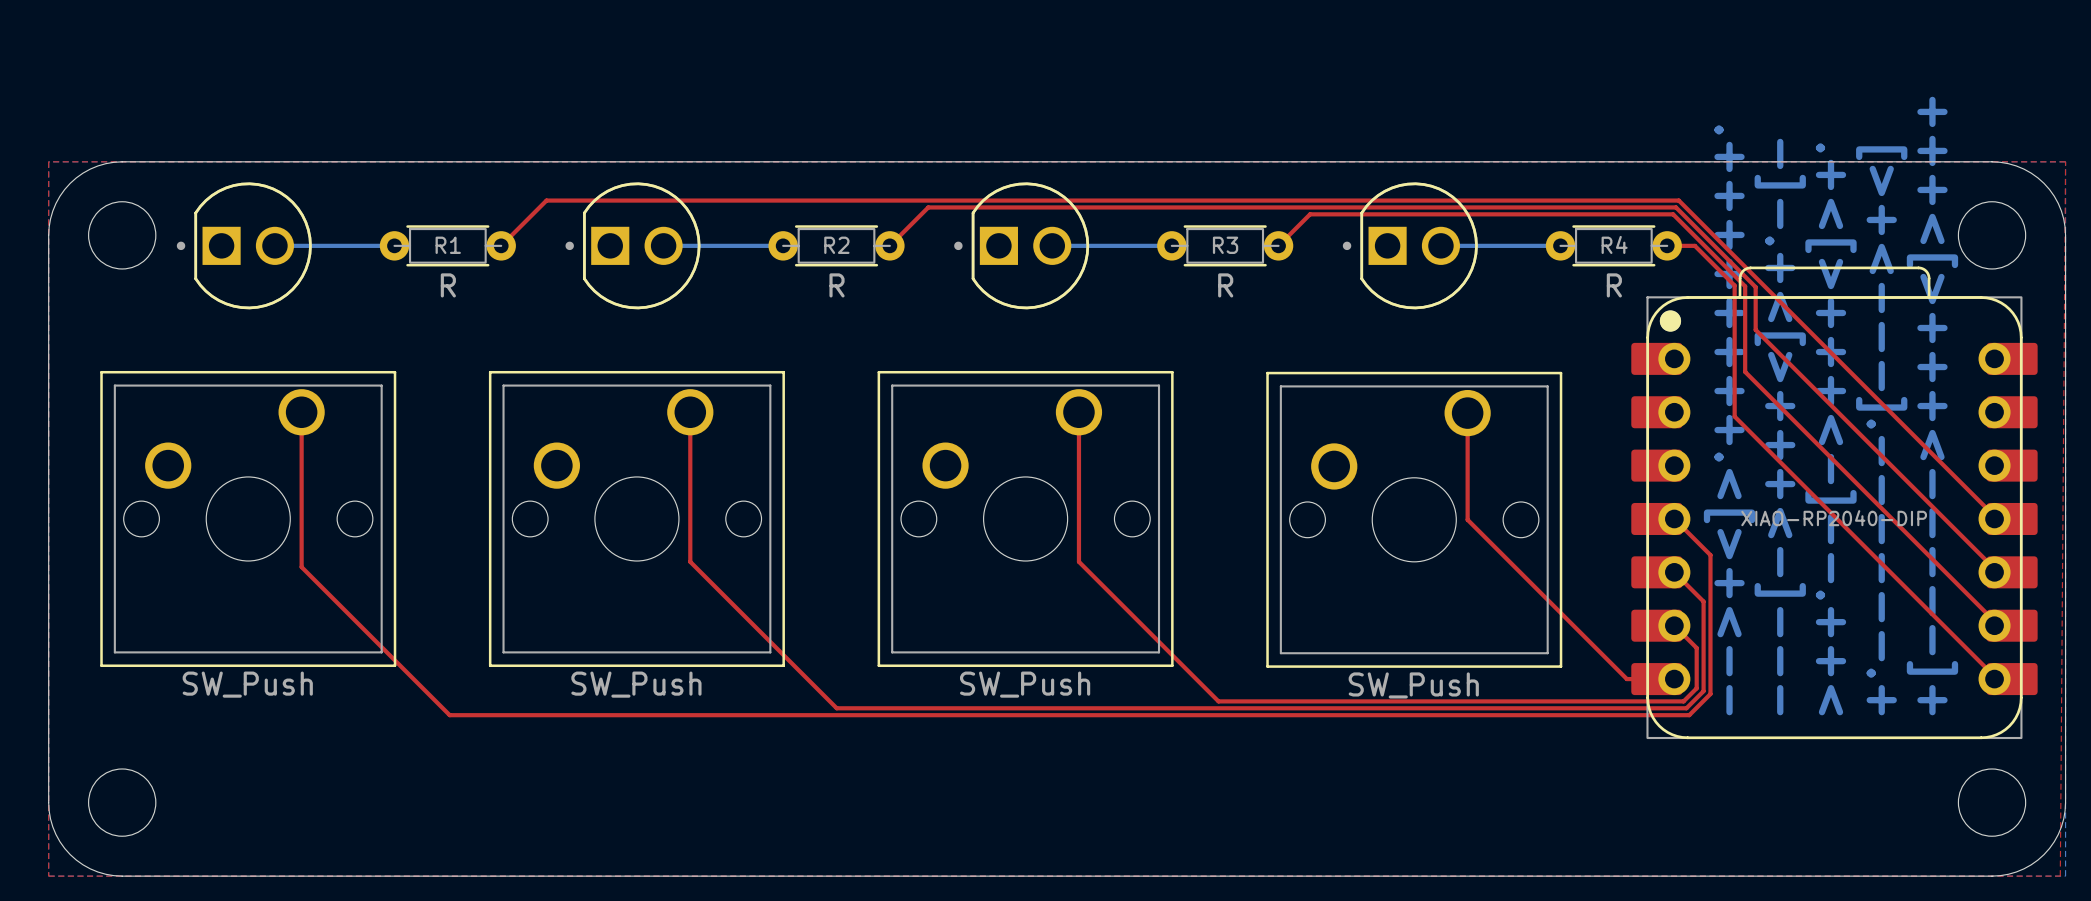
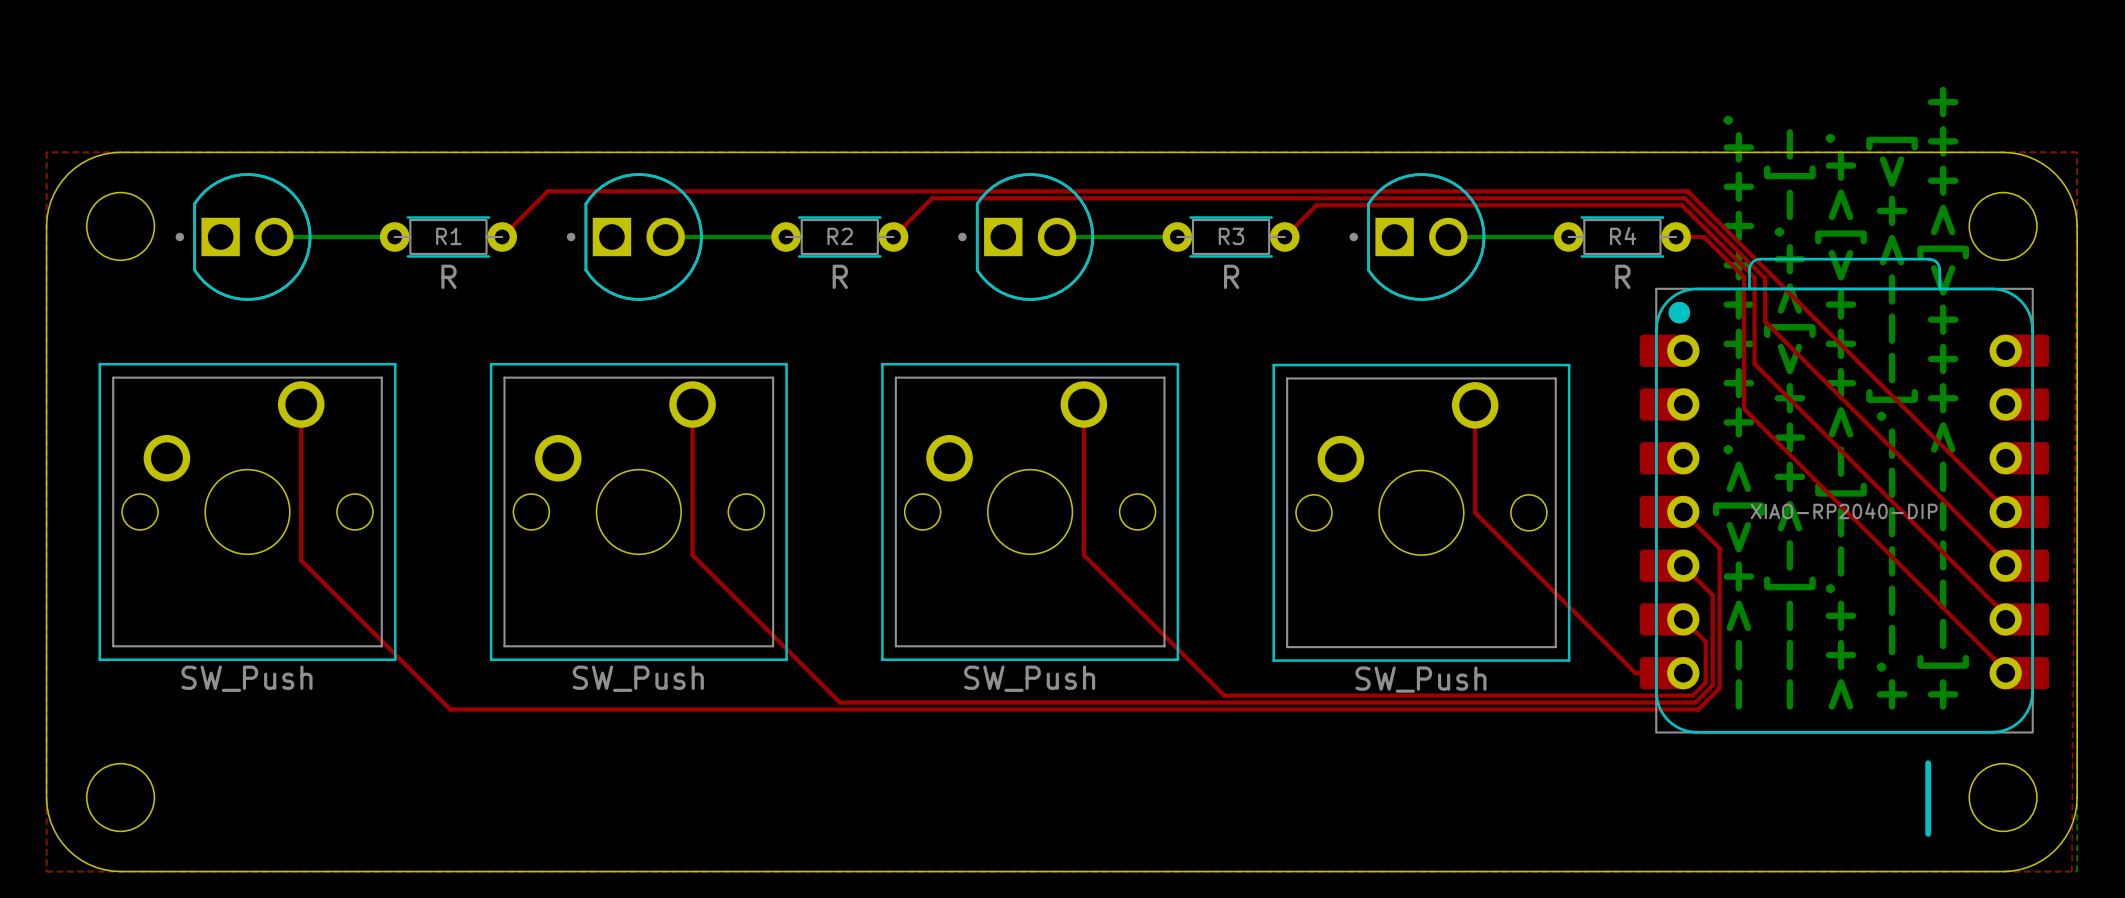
line: none -> (1928, 763) (1928, 833)

